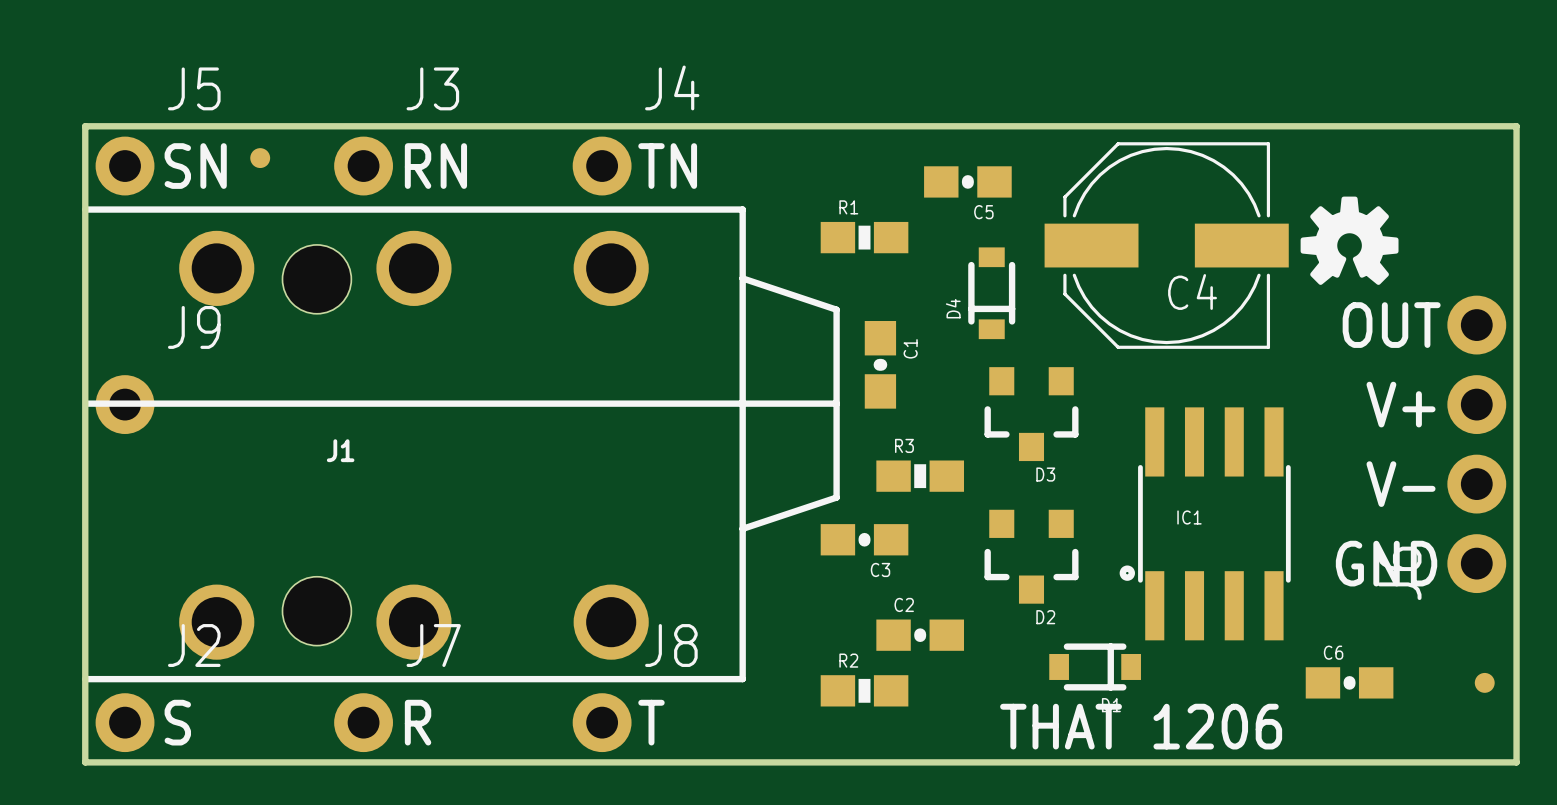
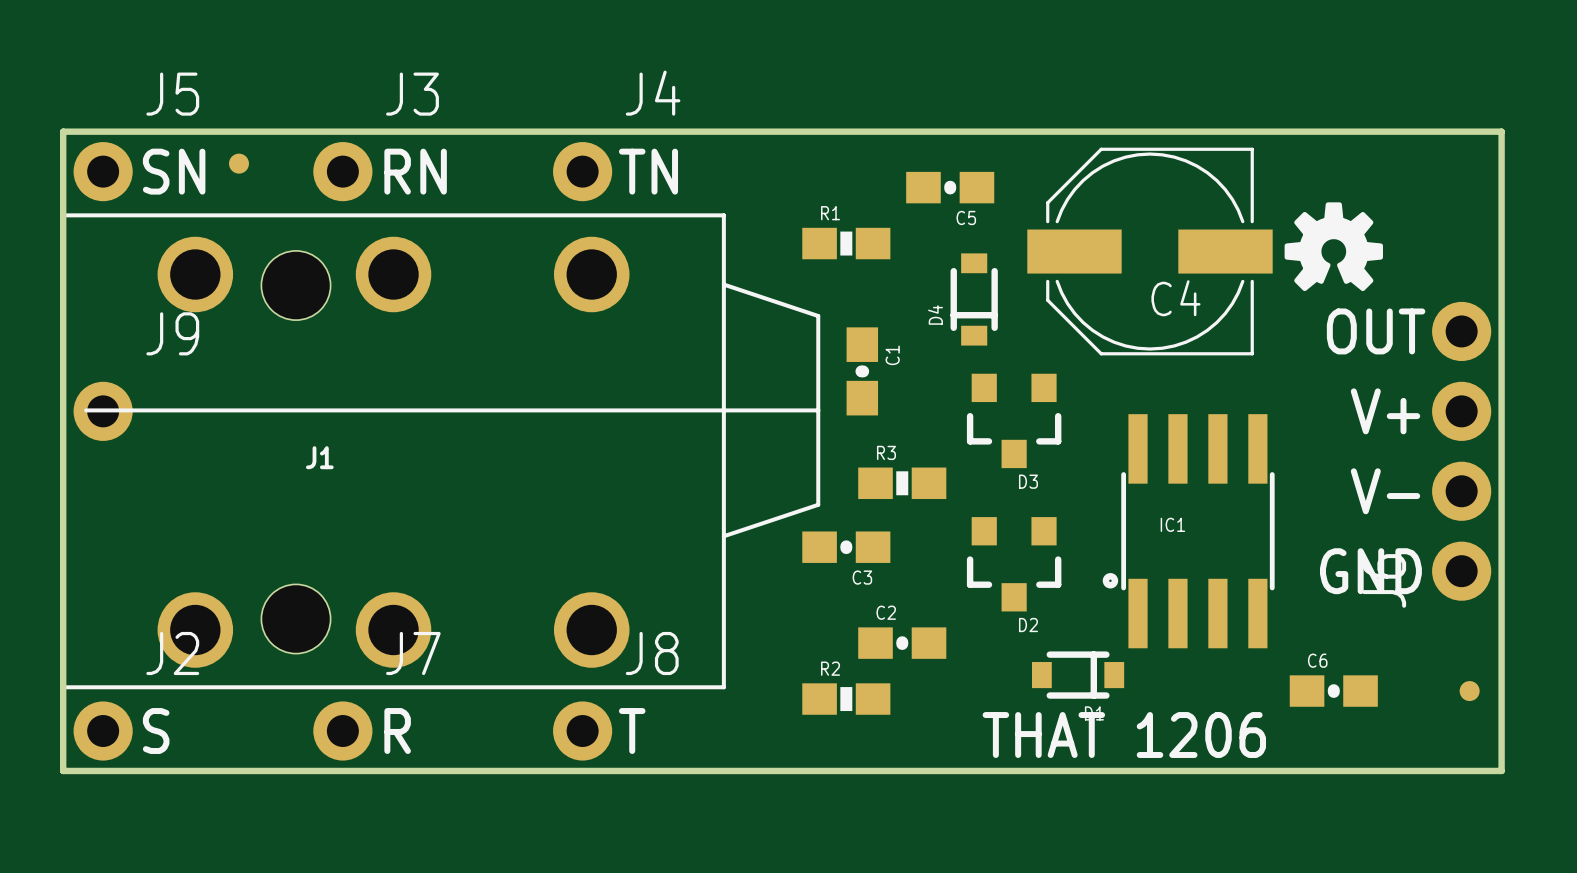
J1 footprint: [82, 206, 840, 683] -> [61, 213, 821, 690]

